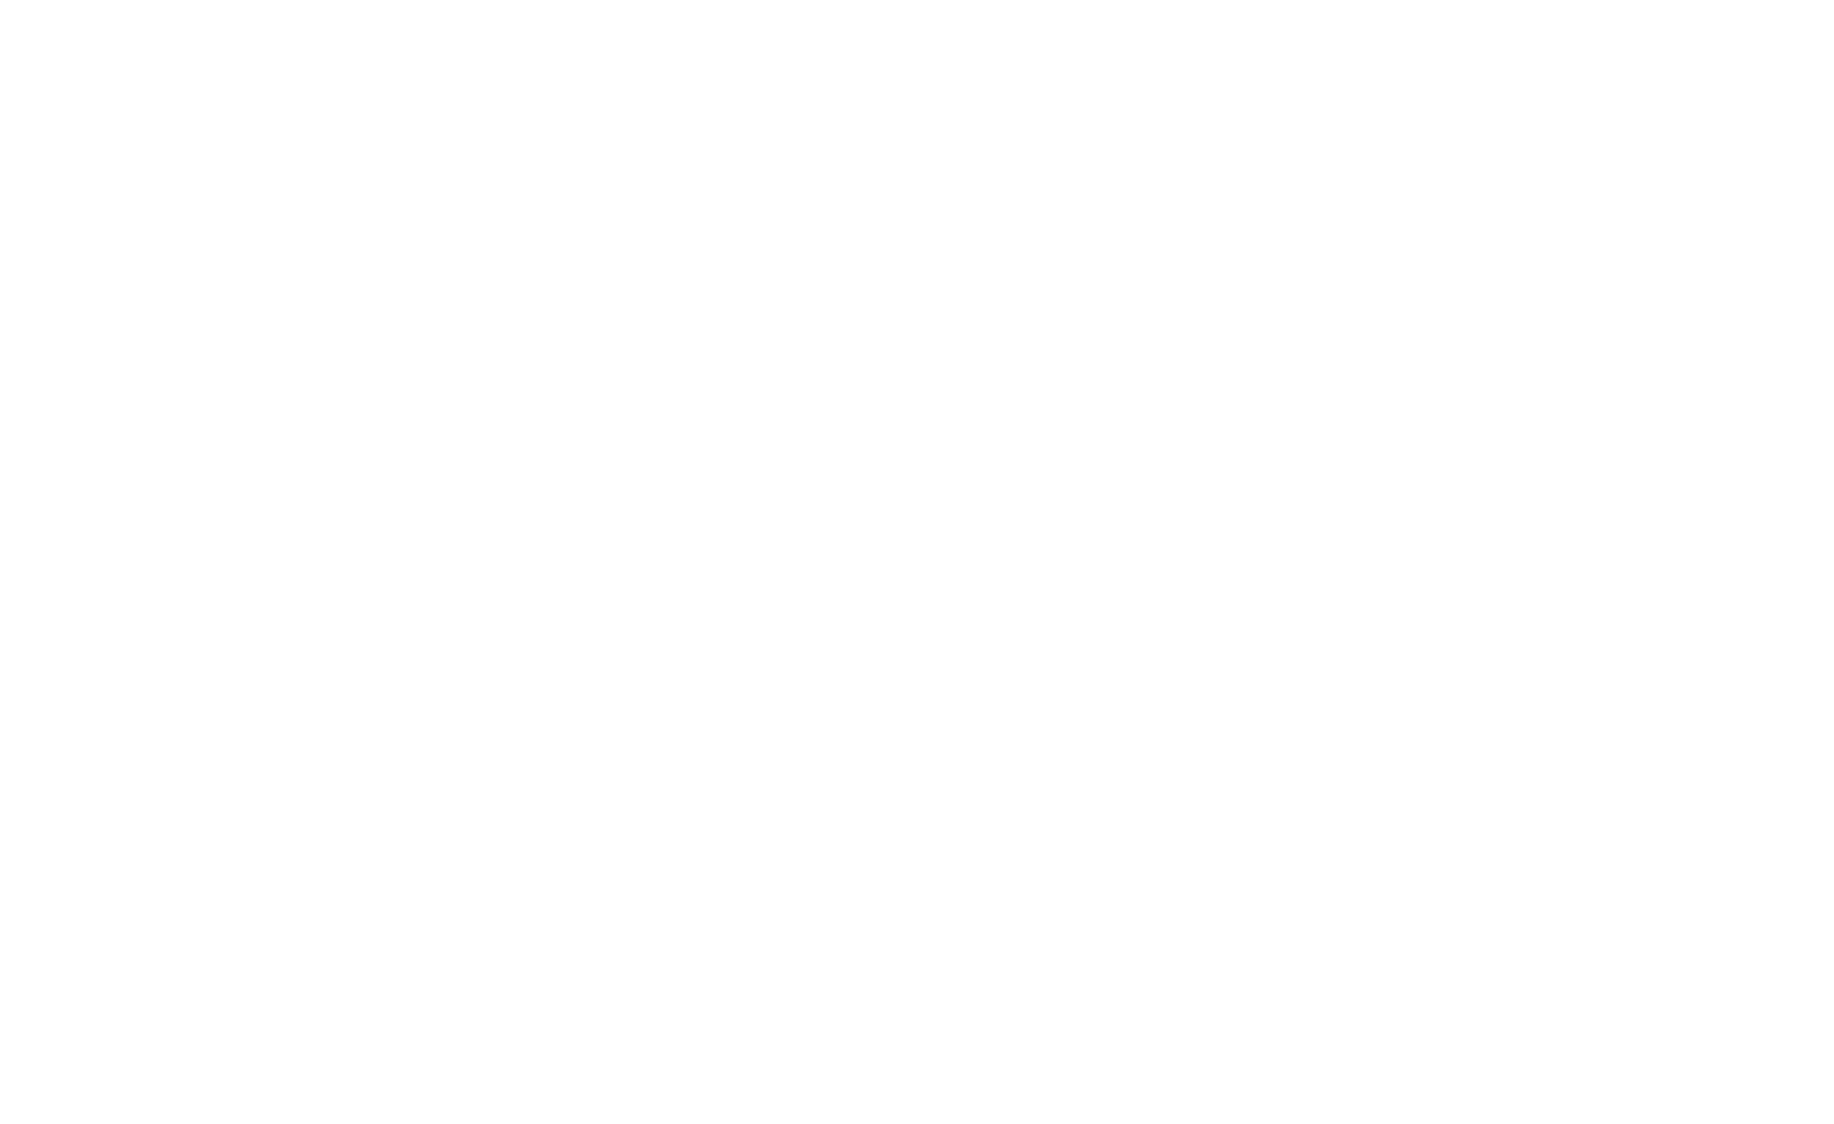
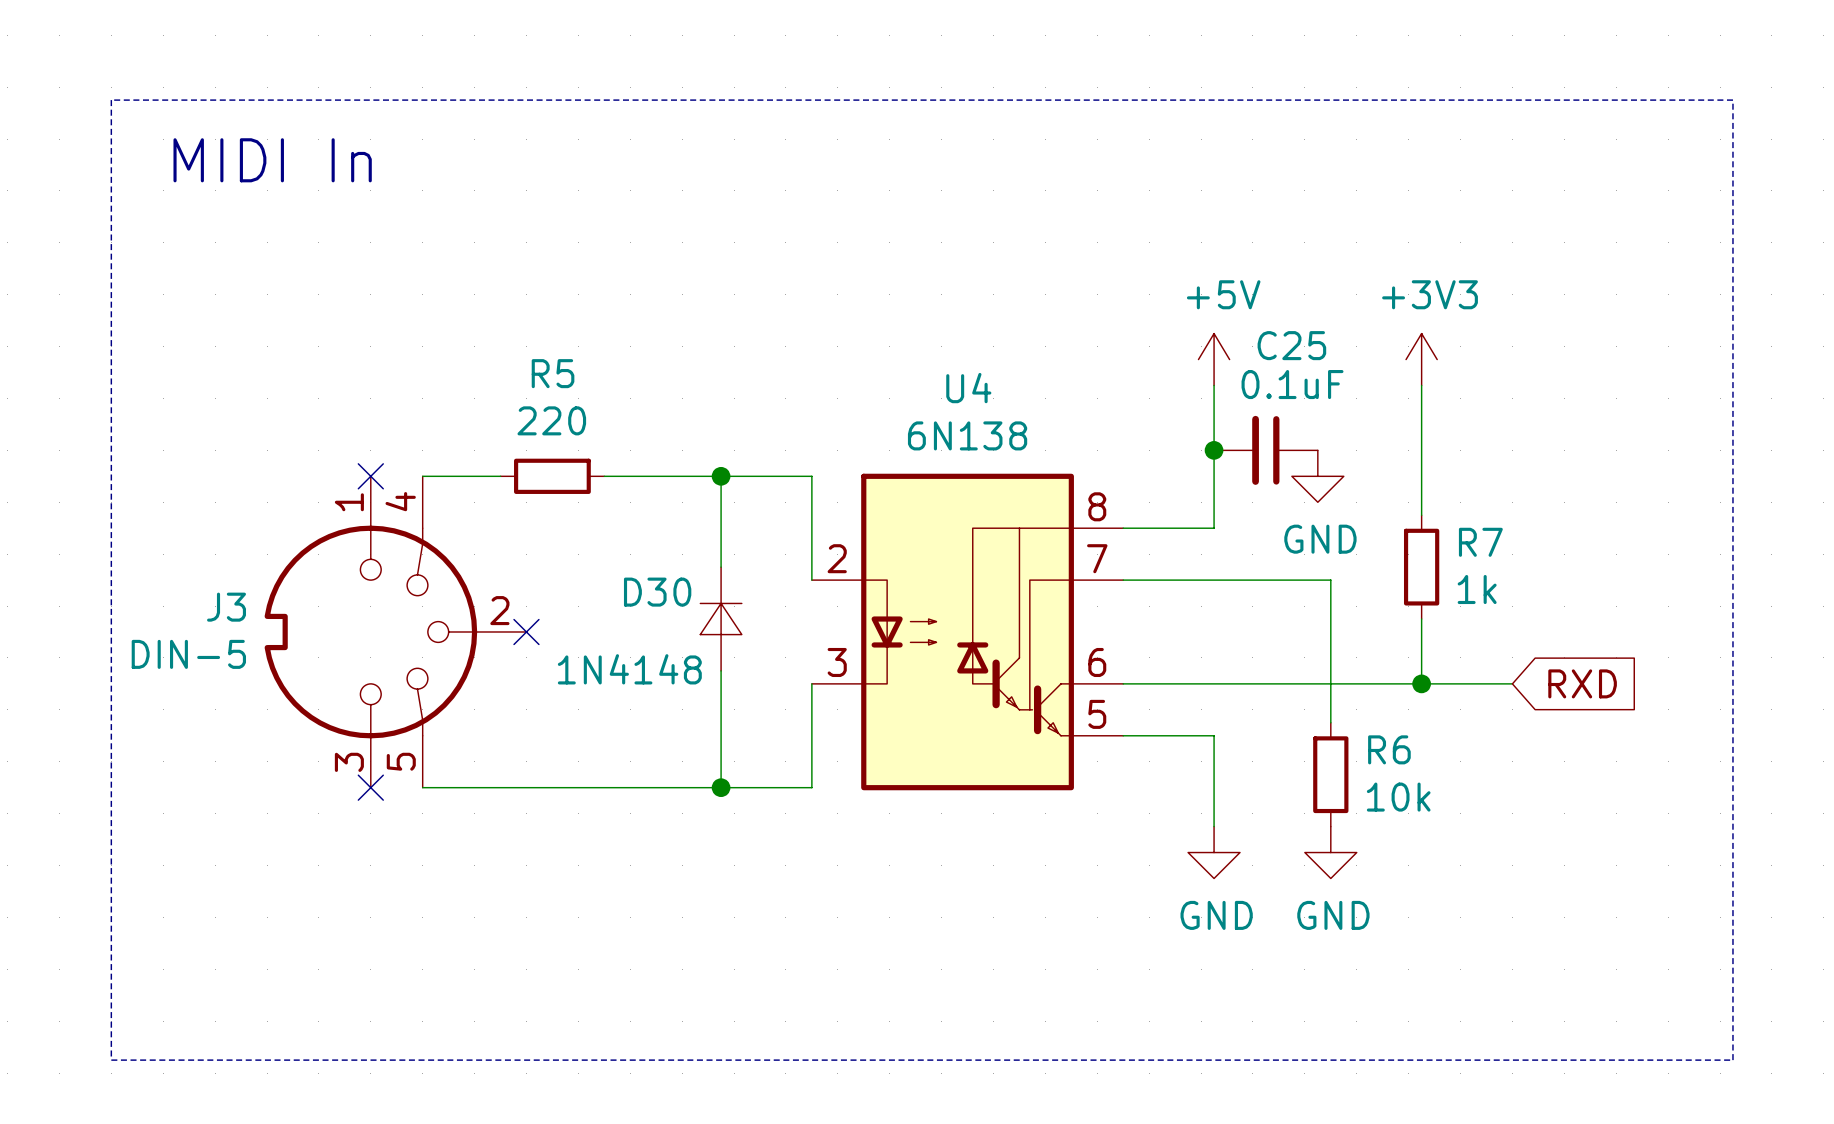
line: none -> (111, 100) (1732, 100) (1732, 1060) (111, 1060) (111, 100)
text: none -> MIDI In (272, 160)
power symbol: none -> +5V (1214, 359)
power symbol: none -> +3V3 (1421, 359)
wire: none -> (1214, 385) (1214, 528) (1123, 528)
wire: none -> (1421, 385) (1421, 515)
junction: none -> (1214, 450)
C25: none -> 0.1uF (1265, 450)
no-connect mark: none -> (370, 476)
wire: none -> (422, 476) (500, 476)
R5: none -> 220 (552, 476)
wire: none -> (604, 476) (811, 476) (811, 580)
wire: none -> (721, 476) (721, 567)
junction: none -> (721, 476)
power symbol: none -> GND (1317, 476)
R7: none -> 1k (1421, 567)
wire: none -> (1123, 580) (1330, 580) (1330, 722)
D30: none -> 1N4148 (721, 619)
wire: none -> (1421, 619) (1421, 683)
J3: none -> DIN-5 (395, 631)
no-connect mark: none -> (526, 631)
U4: none -> 6N138 (967, 631)
wire: none -> (721, 670) (721, 787)
wire: none -> (811, 683) (811, 787) (422, 787)
wire: none -> (1123, 683) (1512, 683)
junction: none -> (1421, 683)
global label: none -> RXD (1582, 683)
wire: none -> (1123, 735) (1214, 735) (1214, 826)
R6: none -> 10k (1330, 774)
no-connect mark: none -> (370, 787)
junction: none -> (721, 787)
power symbol: none -> GND (1214, 852)
power symbol: none -> GND (1330, 852)

